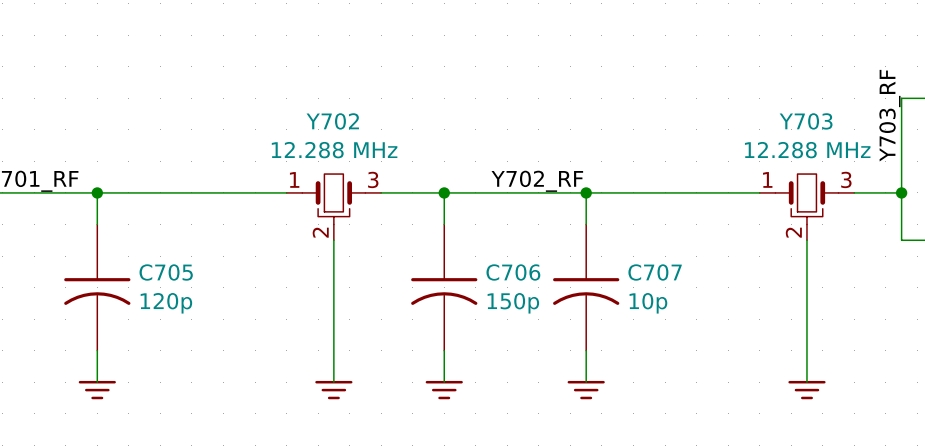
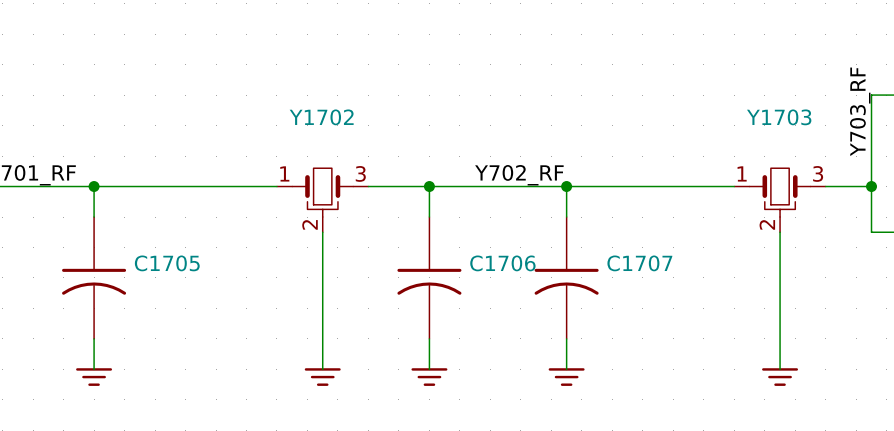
Y702 name: Y702 (332, 121) -> Y1702 (321, 117)
Y703 name: Y703 (806, 121) -> Y1703 (779, 117)
Y702 value: 12.288 MHz (334, 150) -> none
Y703 value: 12.288 MHz (807, 150) -> none
C705 name: C705 (166, 272) -> C1705 (167, 263)
C706 name: C706 (513, 272) -> C1706 (502, 263)
C707 name: C707 (655, 272) -> C1707 (639, 263)
C705 value: 120p (166, 303) -> none
C706 value: 150p (513, 303) -> none
C707 value: 10p (648, 303) -> none

